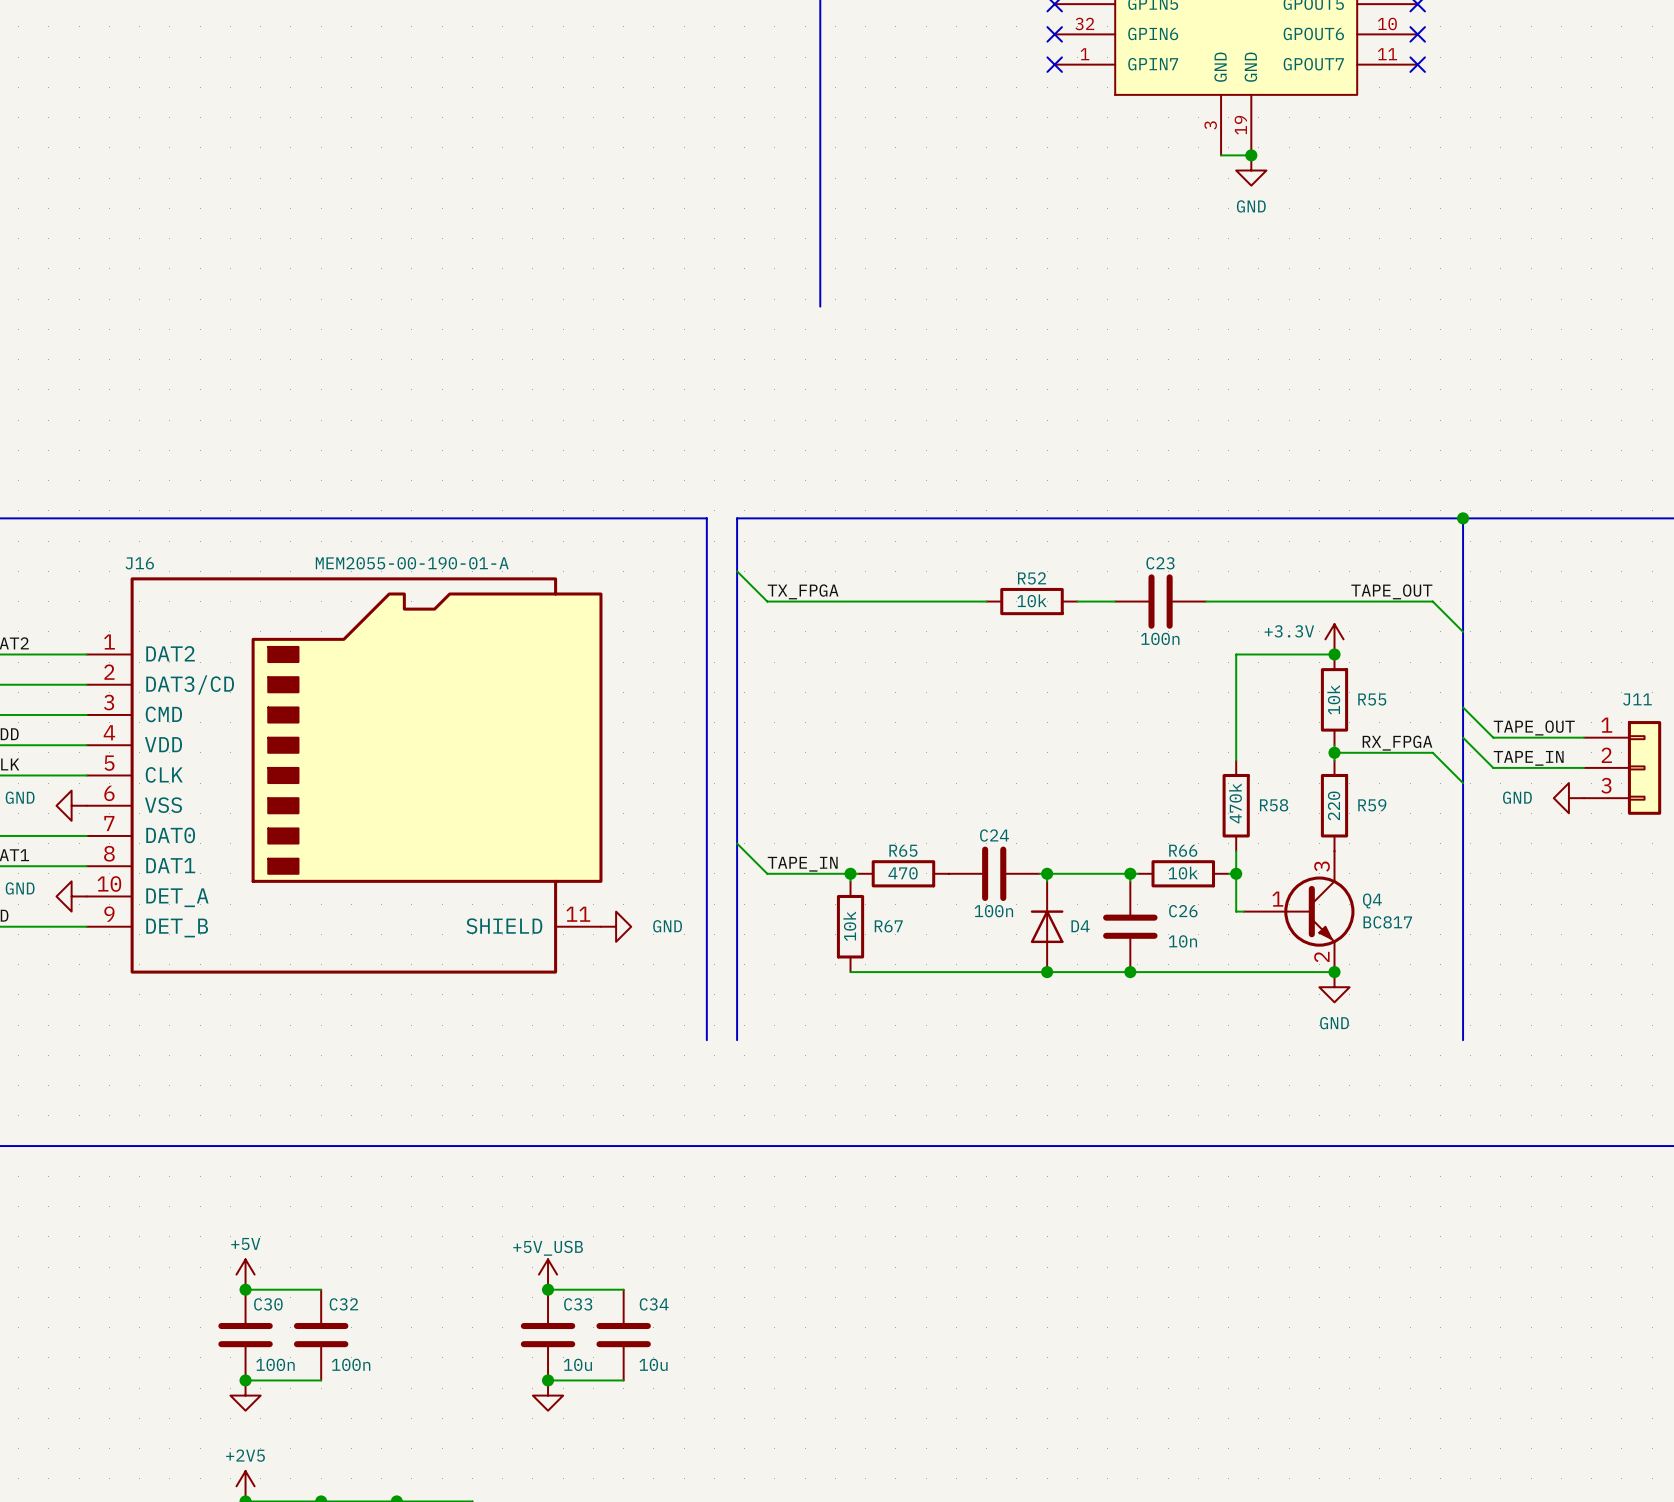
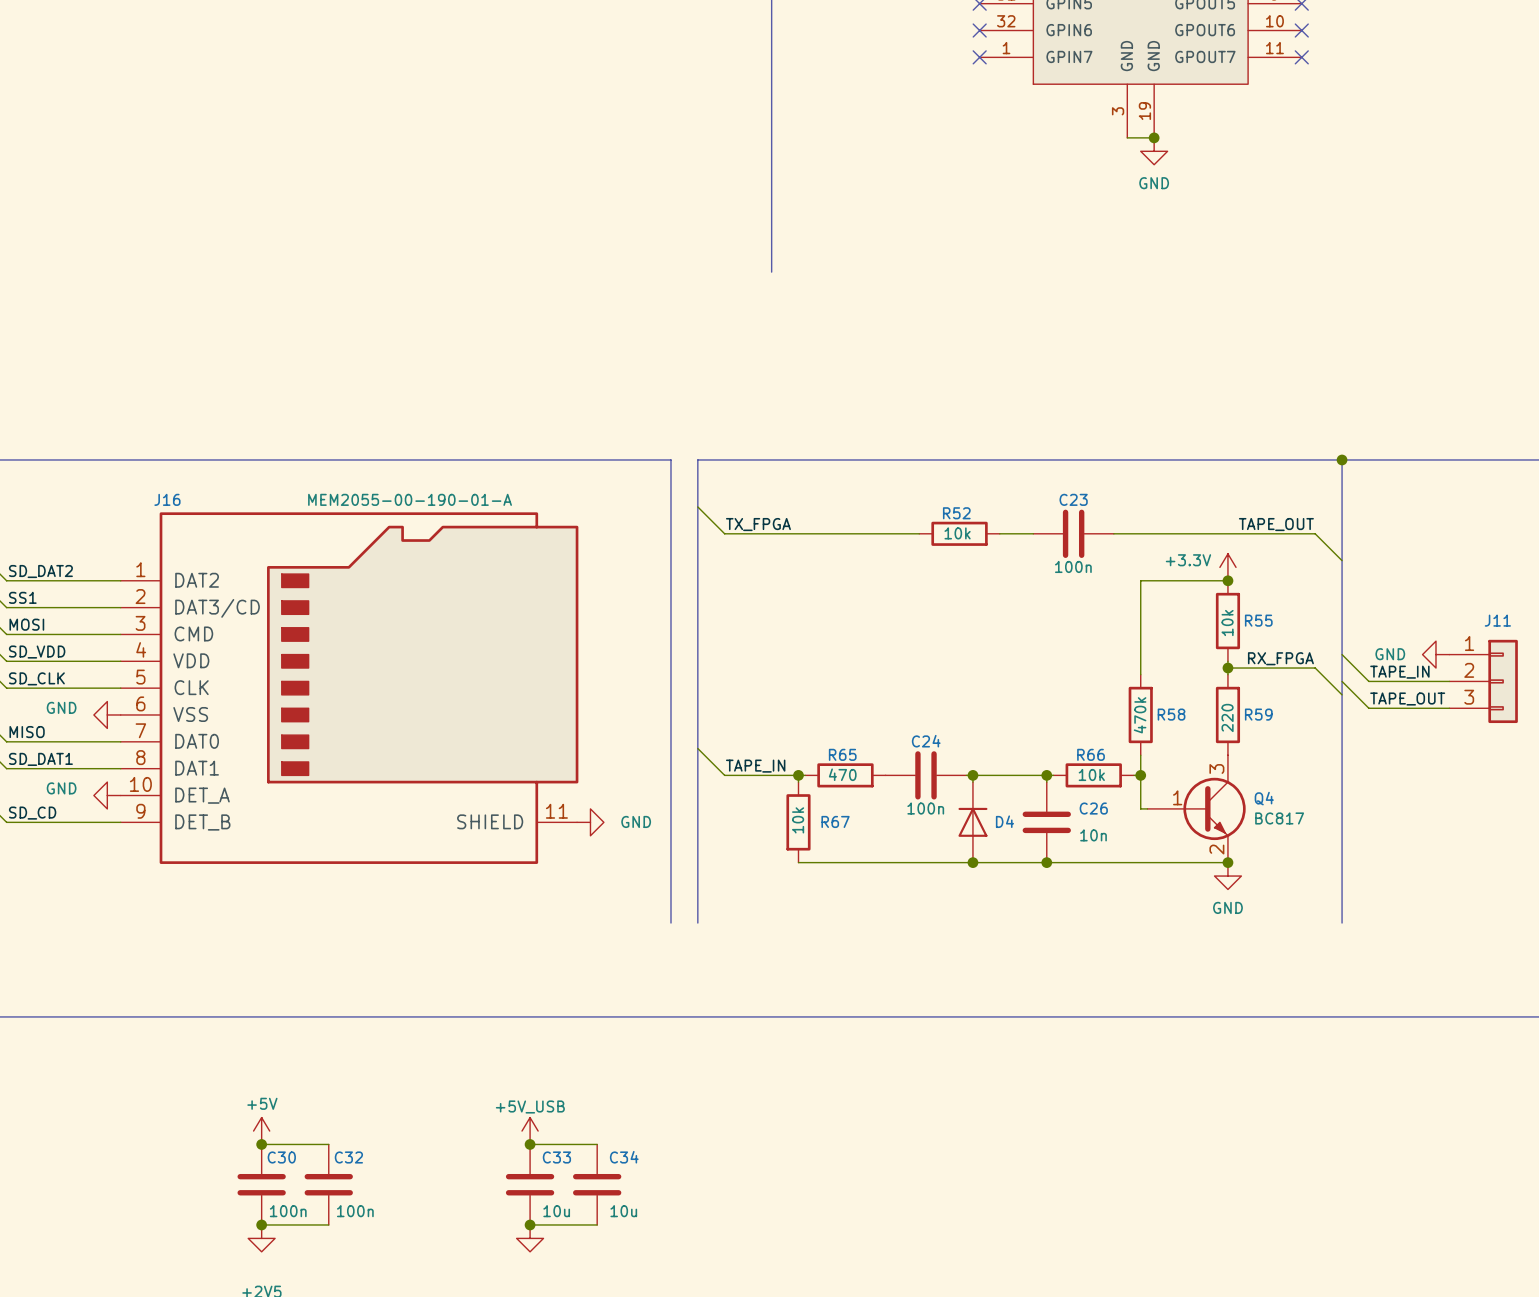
wire: (1463, 707) (1493, 737) (1584, 737) -> (1342, 681) (1368, 708) (1449, 708)
label position: TAPE_OUT (1534, 728) -> TAPE_OUT (1407, 699)
power symbol position: GND (1568, 798) -> GND (1435, 654)

